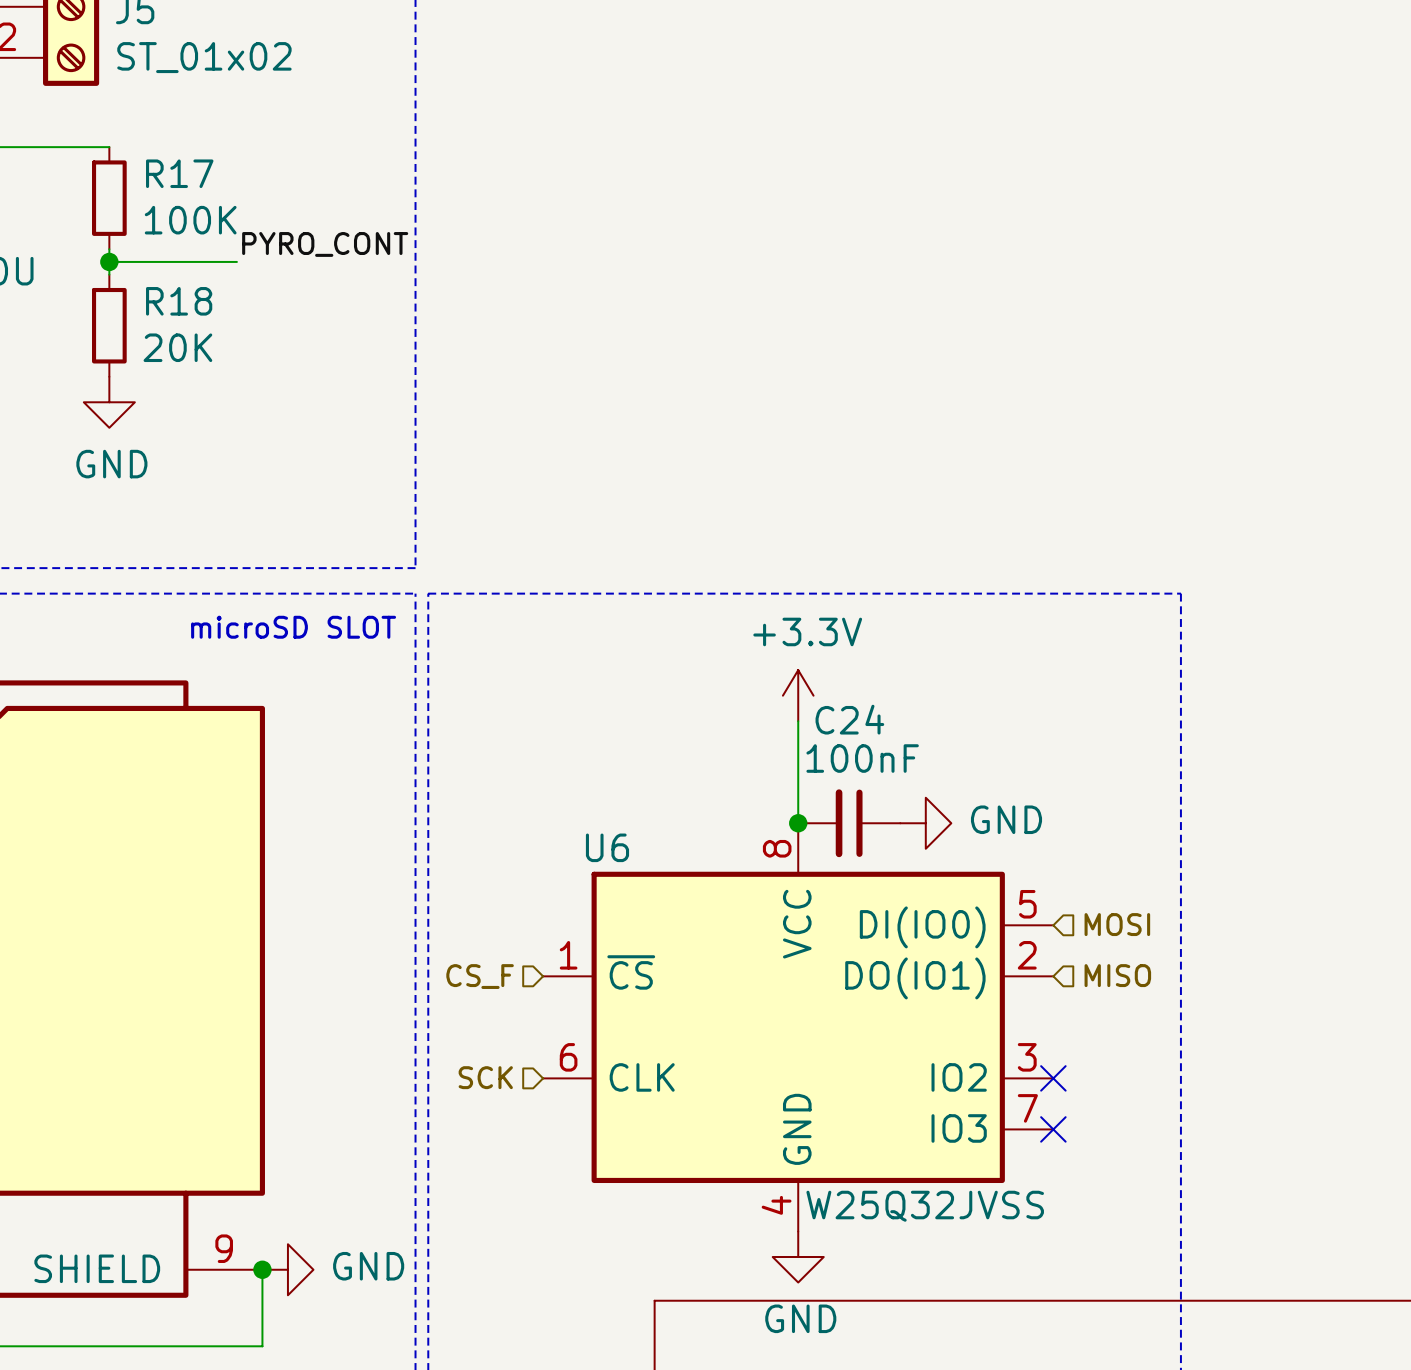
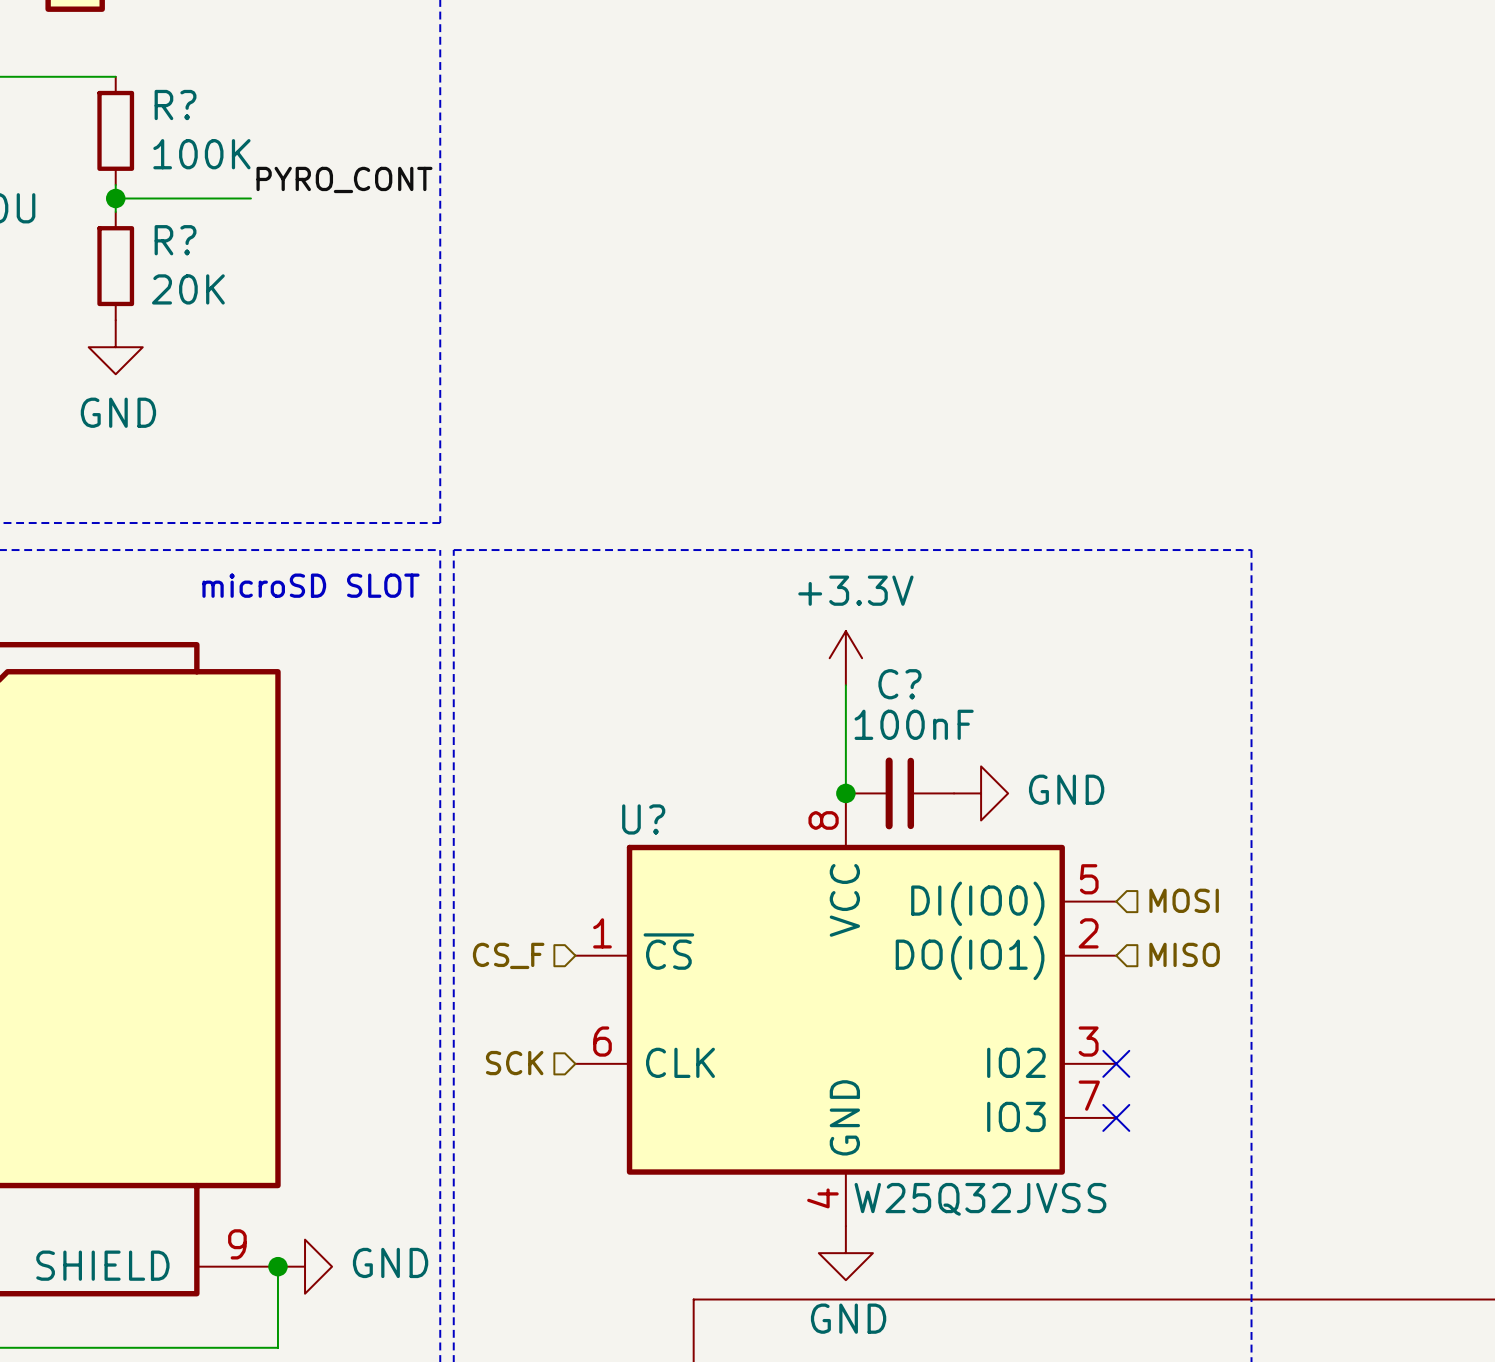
R17 name: R17 (179, 173) -> R? (175, 104)
R18 name: R18 (179, 301) -> R? (175, 240)
C24 name: C24 (849, 719) -> C? (899, 684)
U6 name: U6 (607, 847) -> U? (643, 819)

